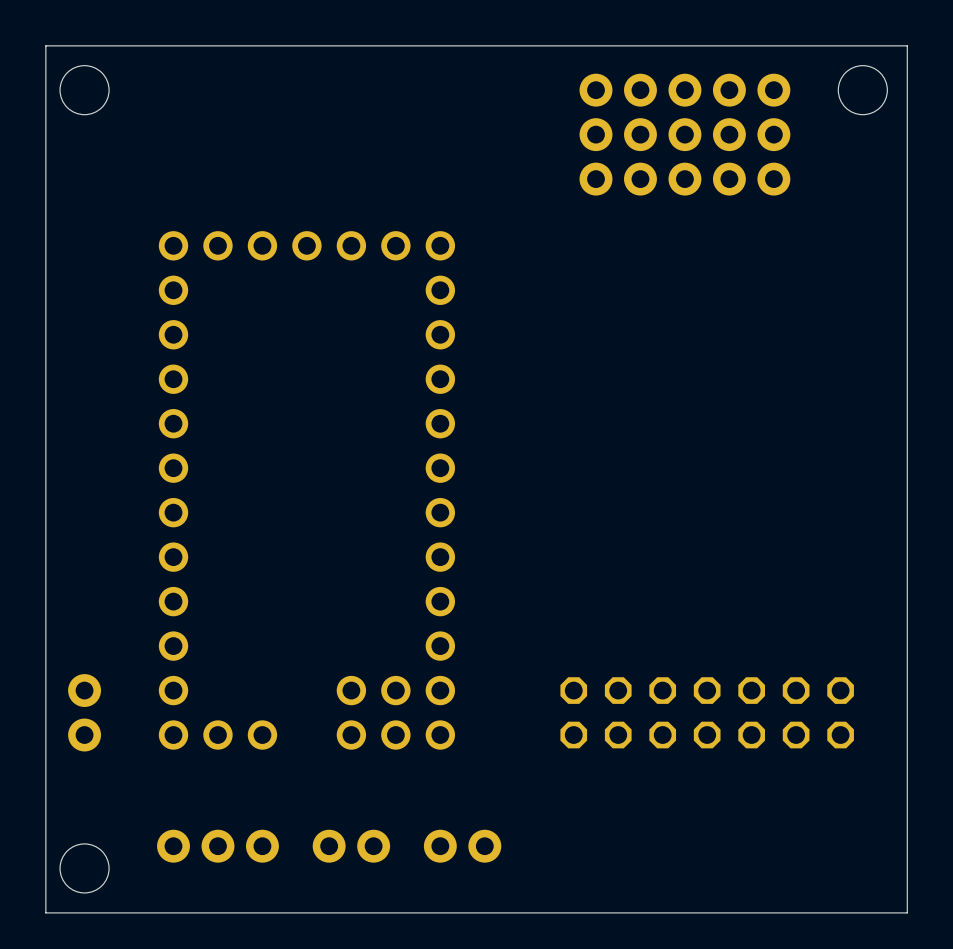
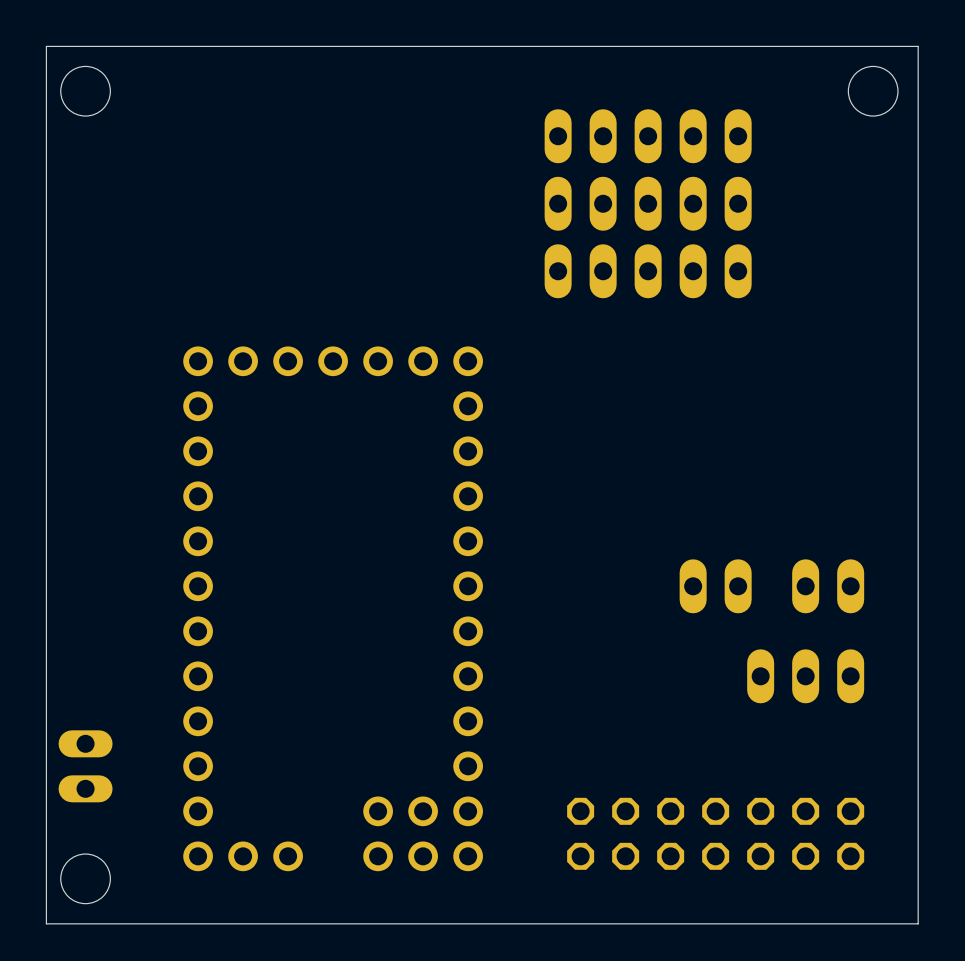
part: (684, 90) -> none
part: none -> (648, 136)
part: (684, 134) -> none
part: (684, 179) -> none
part: none -> (648, 203)
part: none -> (648, 271)
part position: (306, 490) -> (333, 608)
part: none -> (715, 586)
part: none -> (828, 586)
part: none -> (805, 676)
part: (84, 712) -> none
part position: (707, 712) -> (715, 833)
part: none -> (85, 766)
part: (217, 846) -> none
part: (351, 846) -> none
part: (462, 846) -> none

